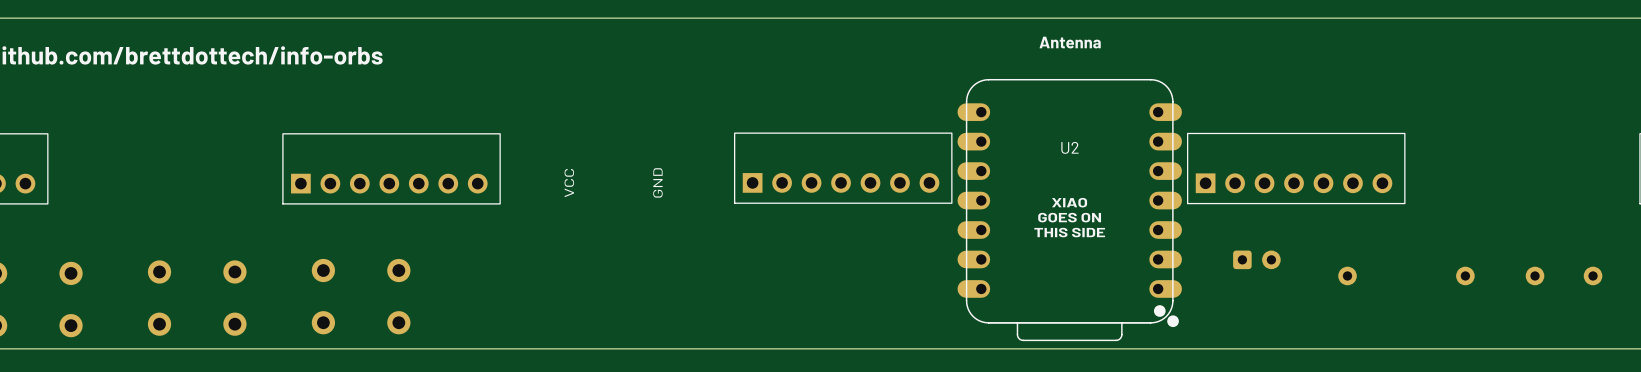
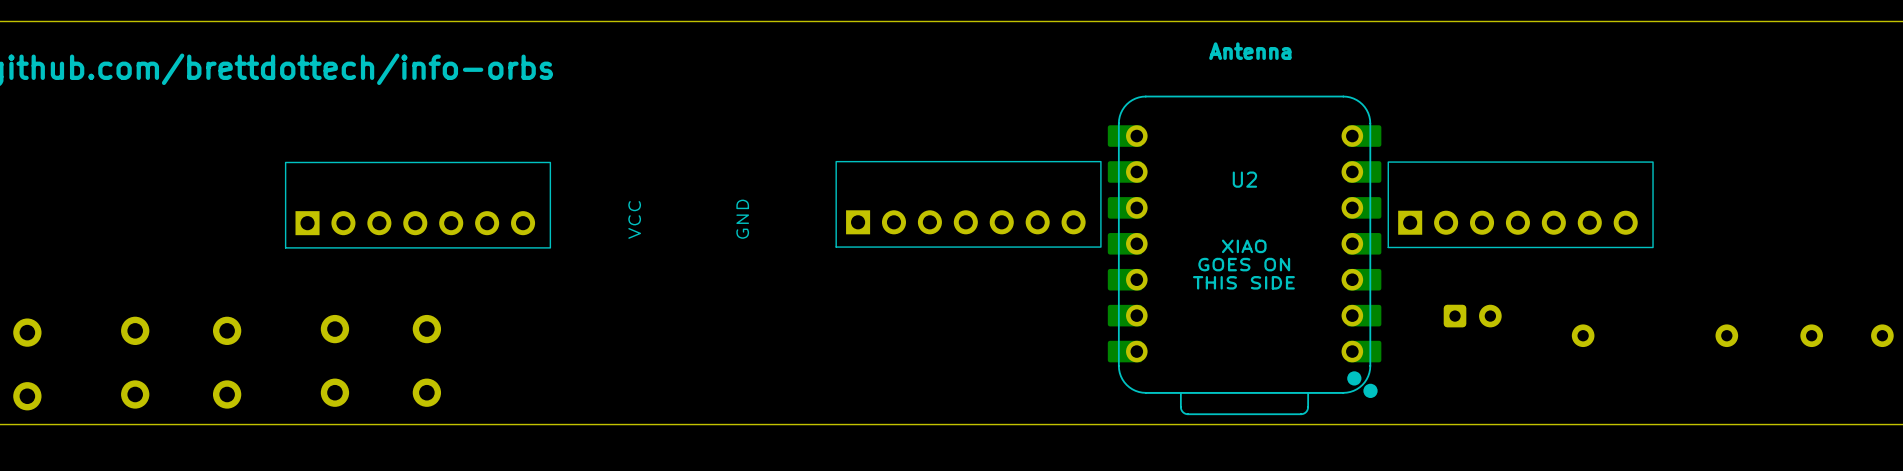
U2 footprint: [957, 78, 1182, 342] -> [1107, 95, 1382, 416]

